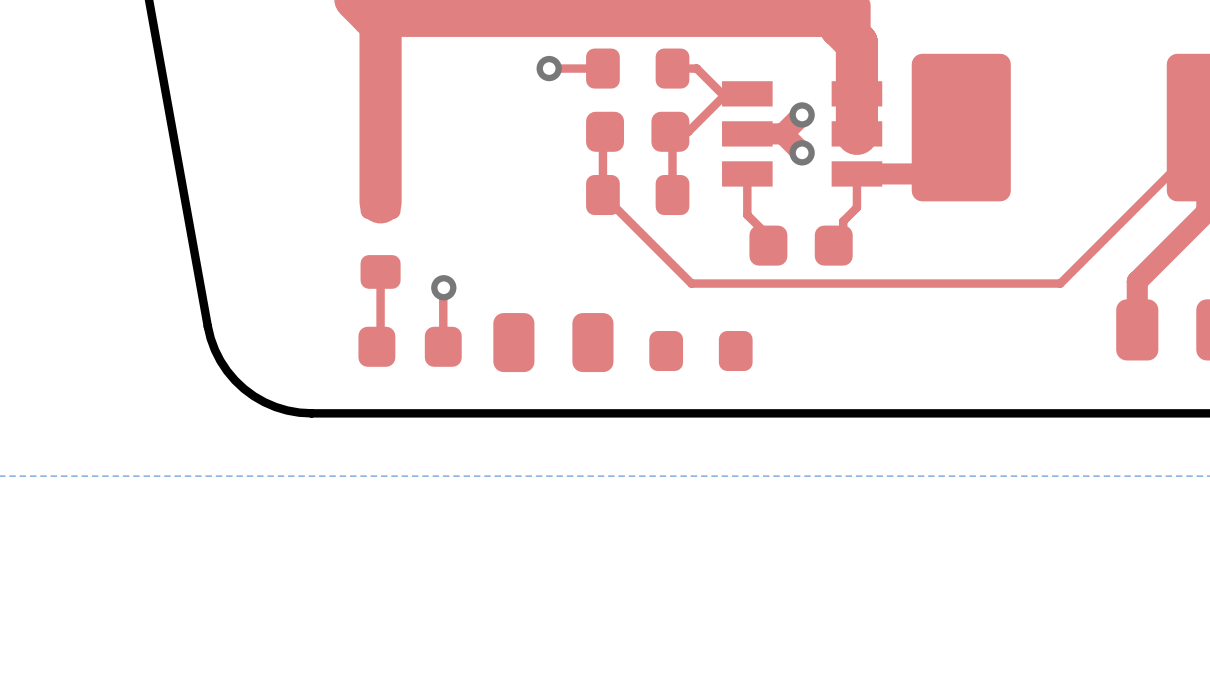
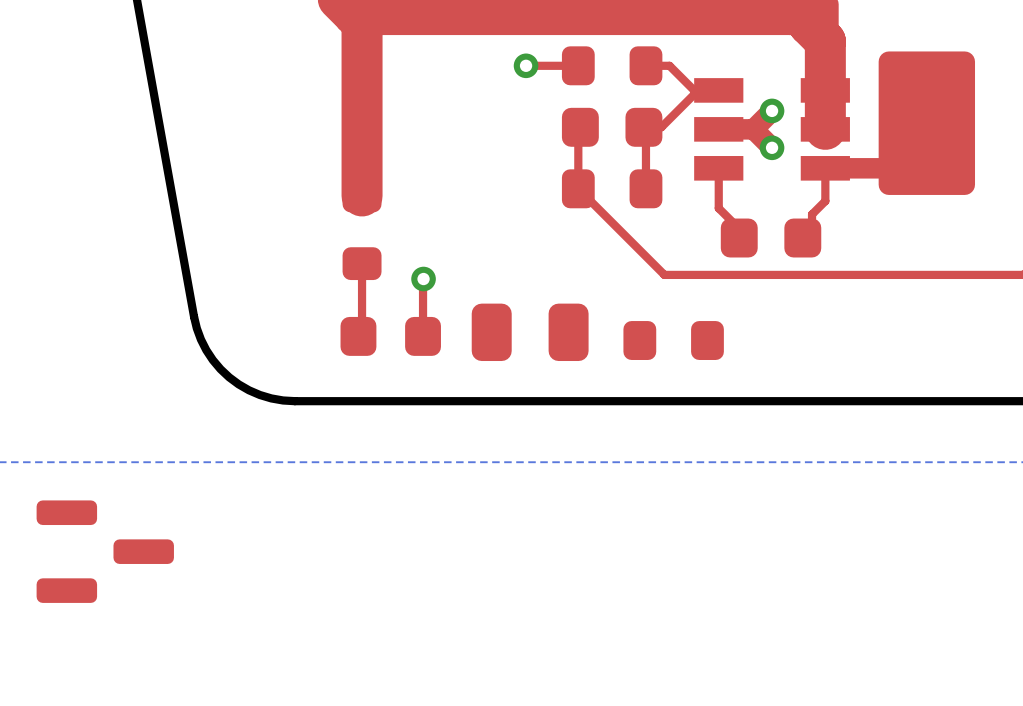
part: none -> (105, 551)

